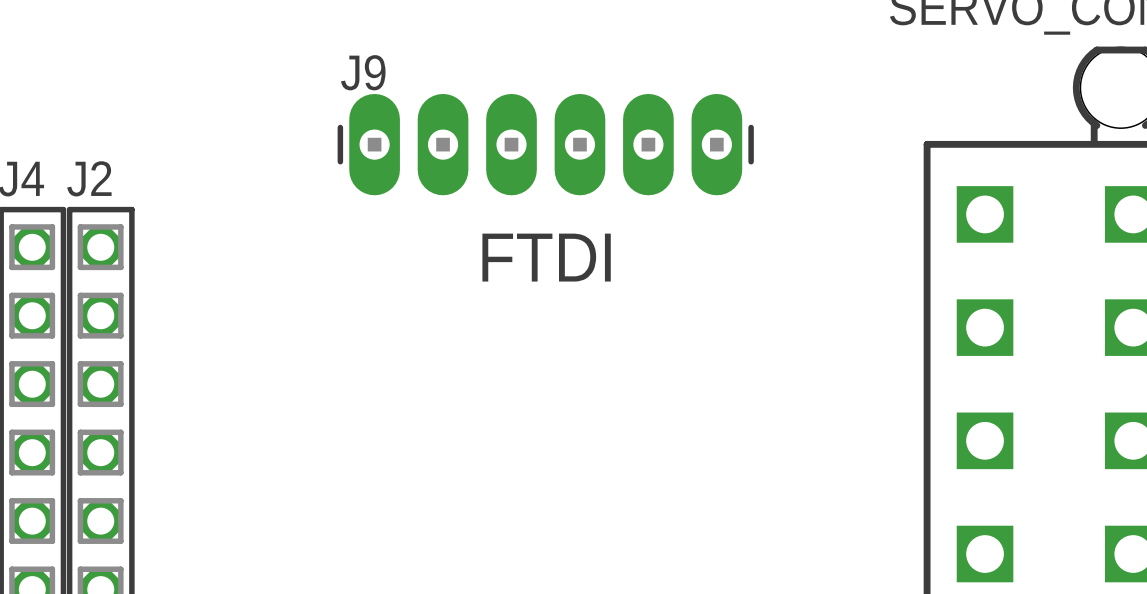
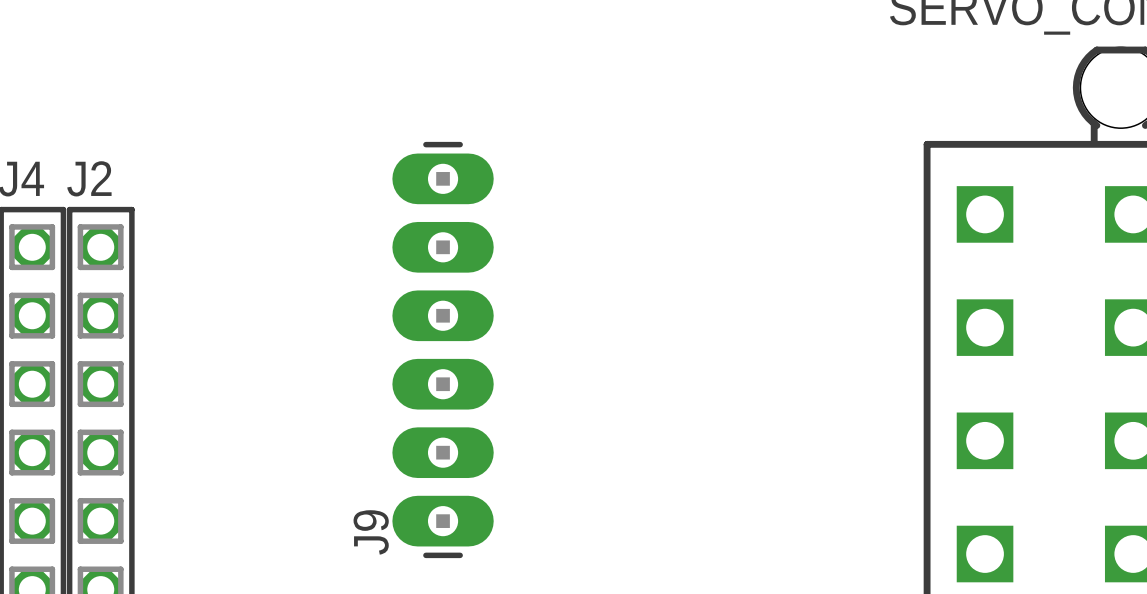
J9 name position: J9 (363, 72) -> J9 (371, 532)
J9 rotation: 0° (545, 144) -> 90° clockwise (443, 349)
text: FTDI (546, 257) -> none

